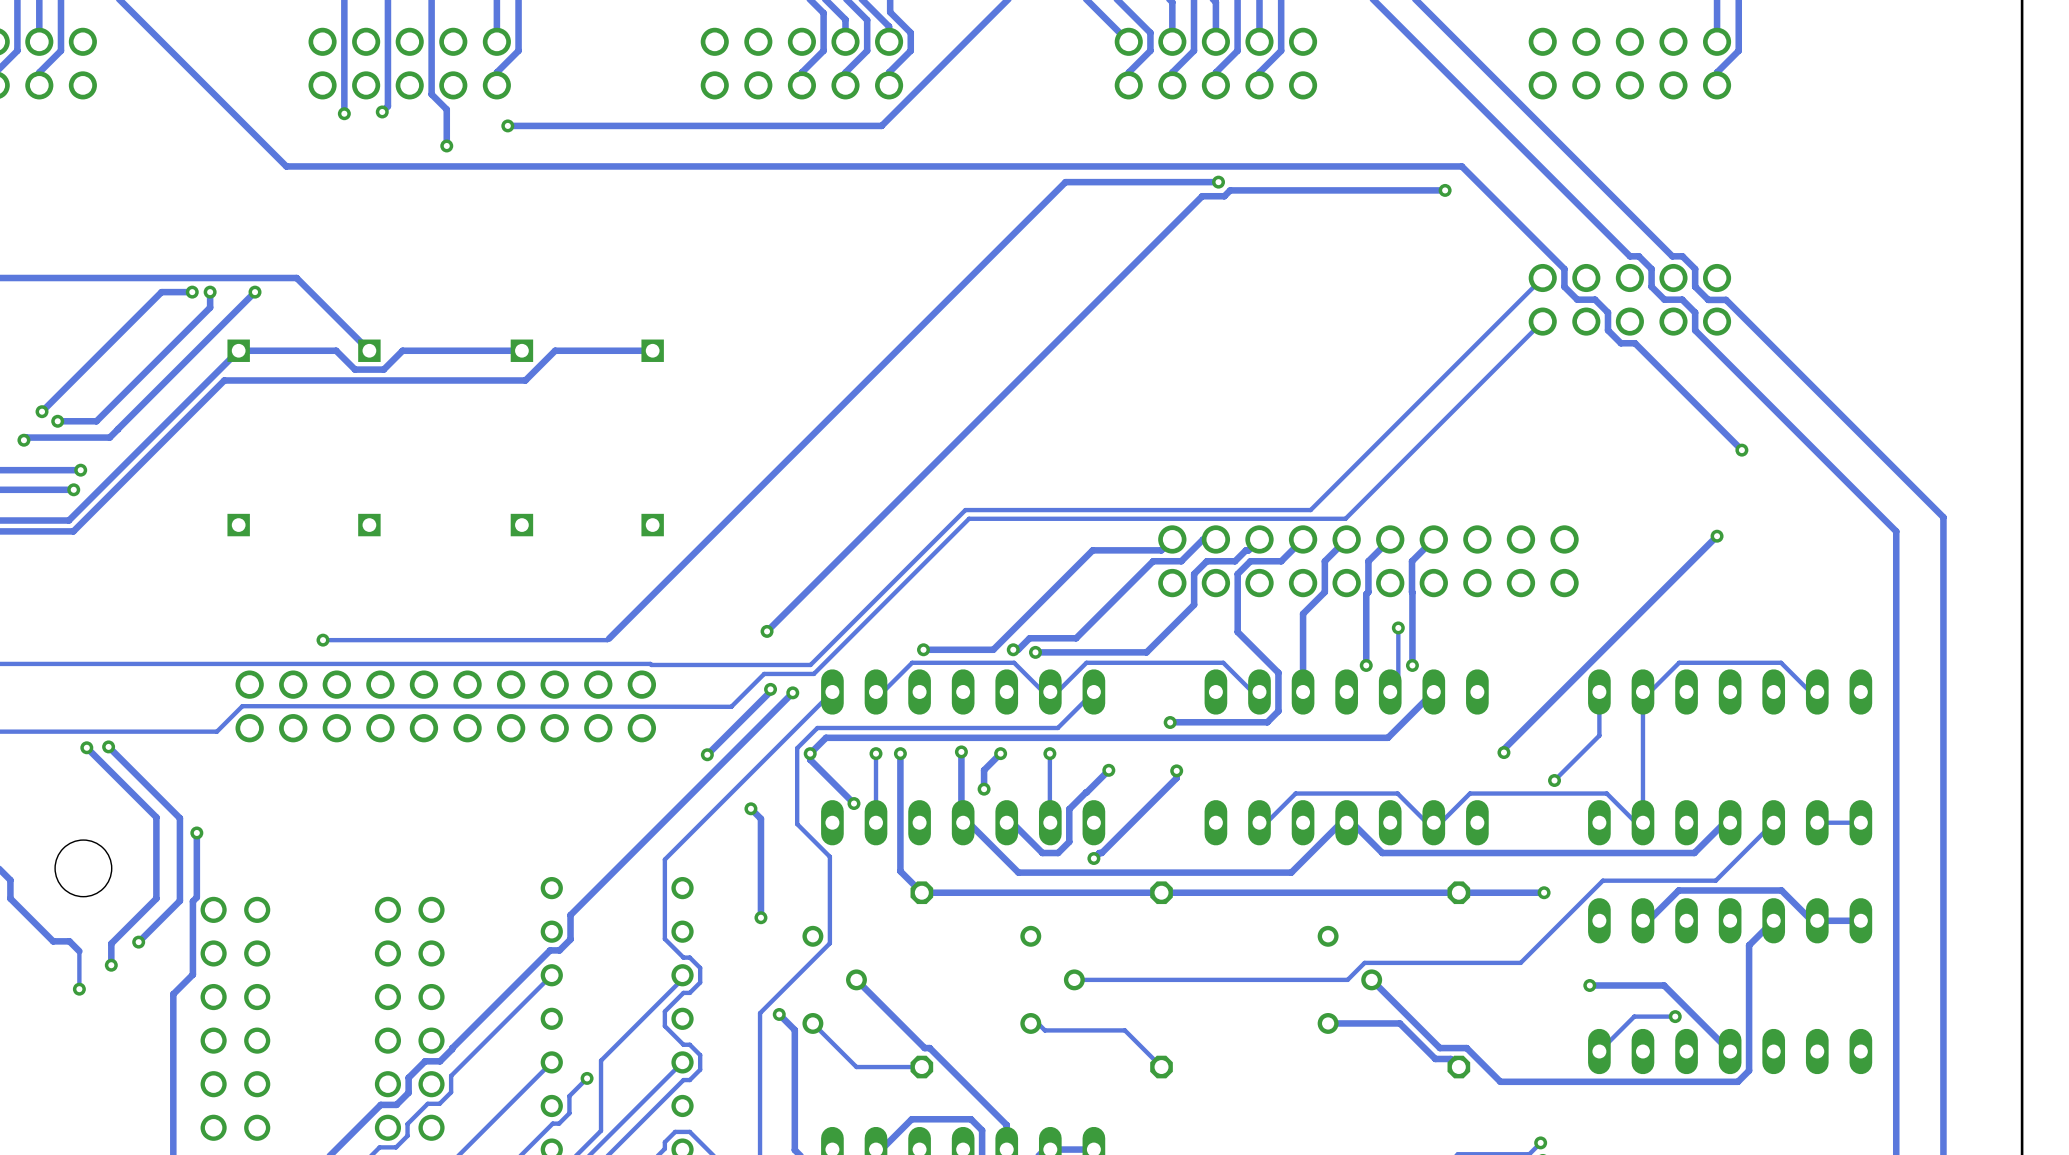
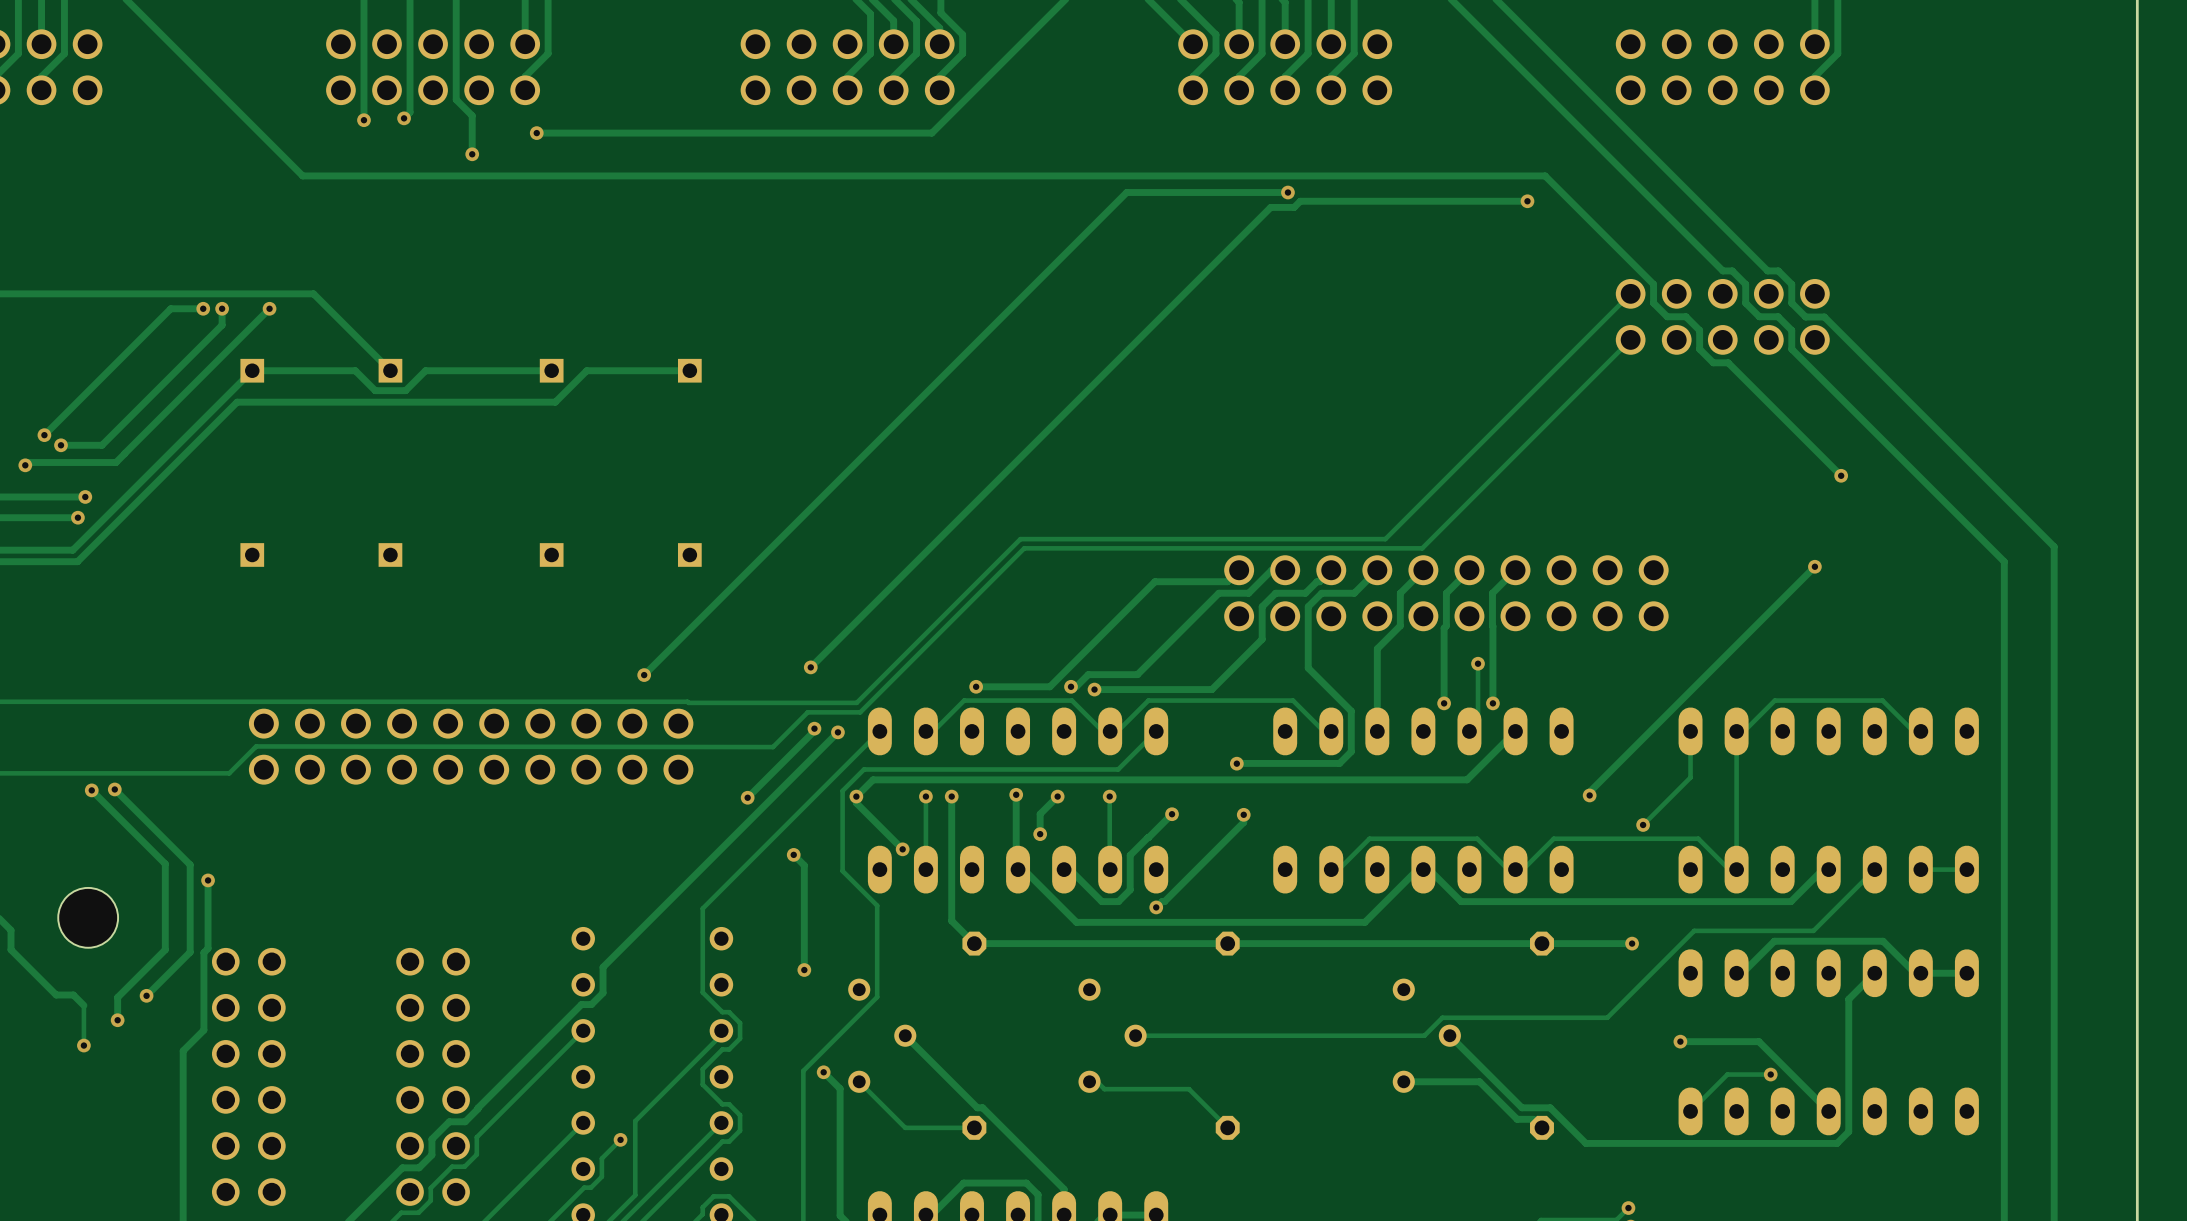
track: (1066, 182) (607, 640) (323, 640) -> (1126, 192) (644, 675)
via: none -> (644, 675)
via: (323, 640) -> none

